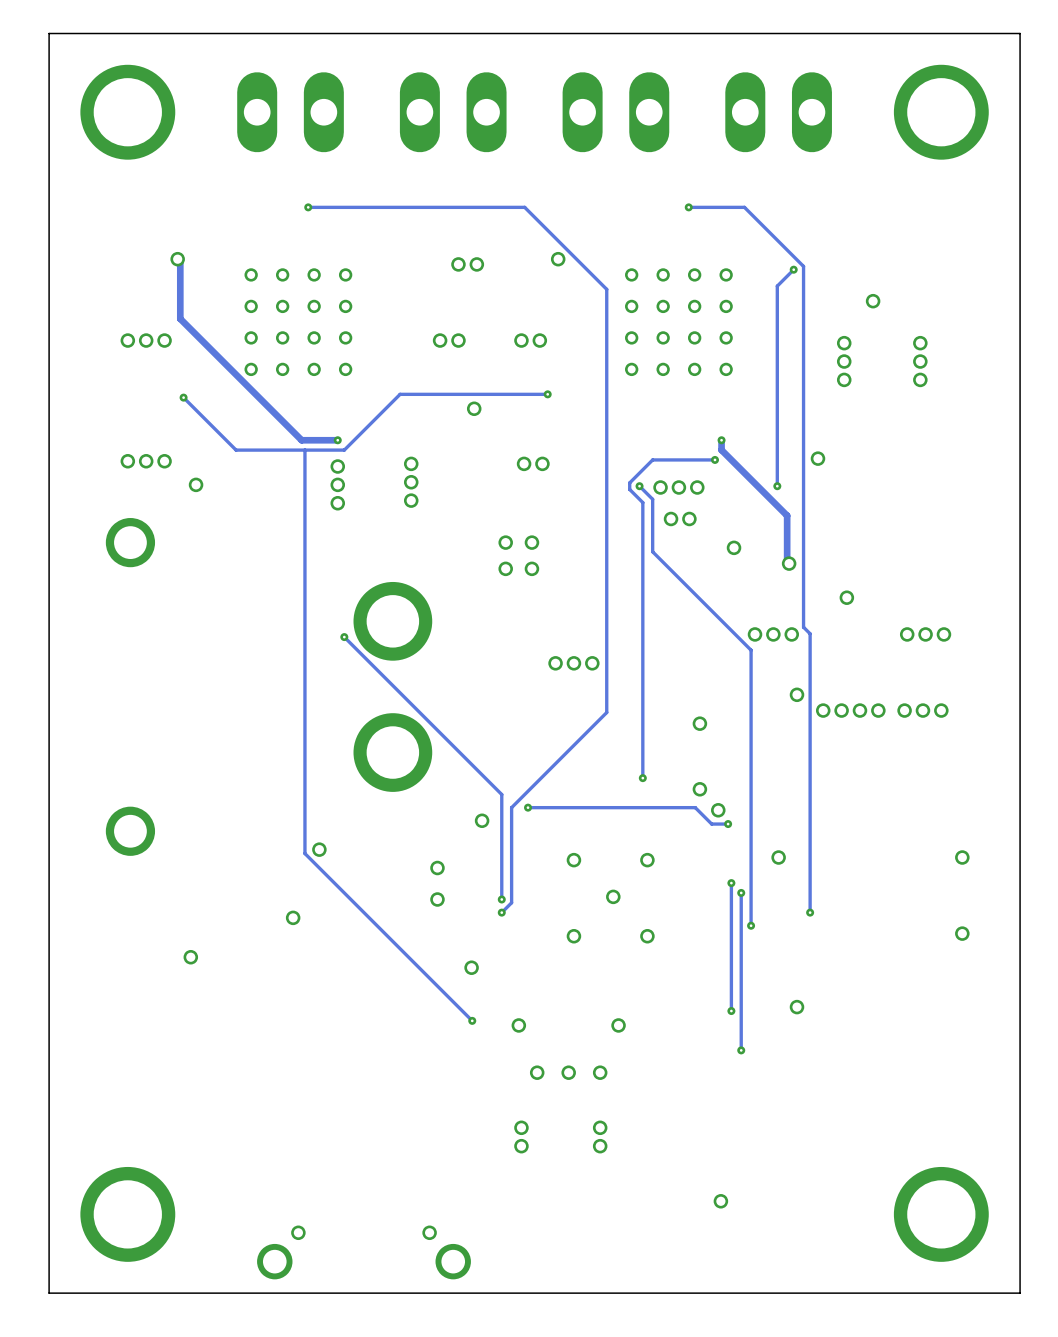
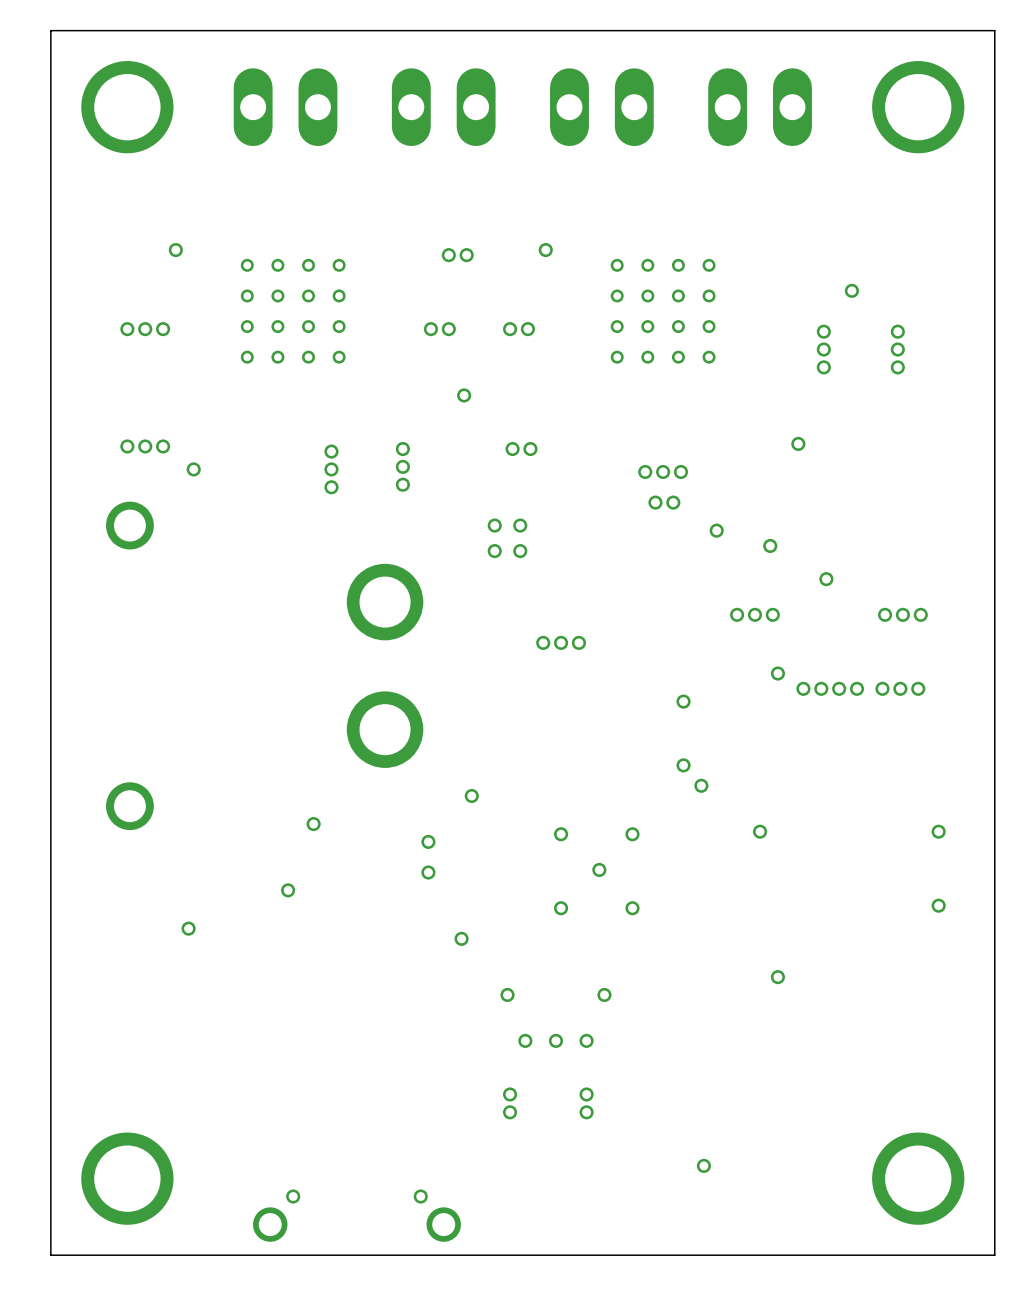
track: (308, 207) (524, 207) (606, 289) (606, 712) (511, 807) (511, 902) (501, 912) -> none
via: (308, 207) -> none
track: (688, 207) (744, 207) (803, 266) (803, 627) (810, 633) (810, 912) -> none
via: (688, 207) -> none
track: (177, 259) (180, 259) (180, 318) (301, 440) (337, 440) -> none
track: (793, 269) (777, 286) (777, 486) -> none
via: (793, 269) -> none
track: (547, 394) (400, 394) (344, 450) (236, 450) (183, 397) -> none
via: (547, 394) -> none
via: (183, 397) -> none
via: (337, 440) -> none
track: (721, 440) (721, 450) (787, 515) (787, 561) (789, 563) -> none
via: (721, 440) -> none
track: (304, 450) (304, 853) (472, 1020) -> none
track: (714, 459) (652, 459) (629, 482) (629, 489) (642, 502) (642, 778) -> none
via: (714, 459) -> none
track: (639, 486) (652, 499) (652, 551) (751, 650) (751, 925) -> none
via: (639, 486) -> none
via: (777, 486) -> none
track: (344, 637) (501, 794) (501, 899) -> none
via: (344, 637) -> none
via: (642, 778) -> none
track: (528, 807) (695, 807) (711, 824) (728, 824) -> none
via: (528, 807) -> none
via: (728, 824) -> none
track: (731, 883) (731, 1011) -> none
via: (731, 883) -> none
track: (741, 892) (741, 1050) -> none
via: (741, 892) -> none
via: (501, 899) -> none
via: (501, 912) -> none
via: (810, 912) -> none
via: (751, 925) -> none
via: (731, 1011) -> none
via: (472, 1020) -> none
via: (741, 1050) -> none

